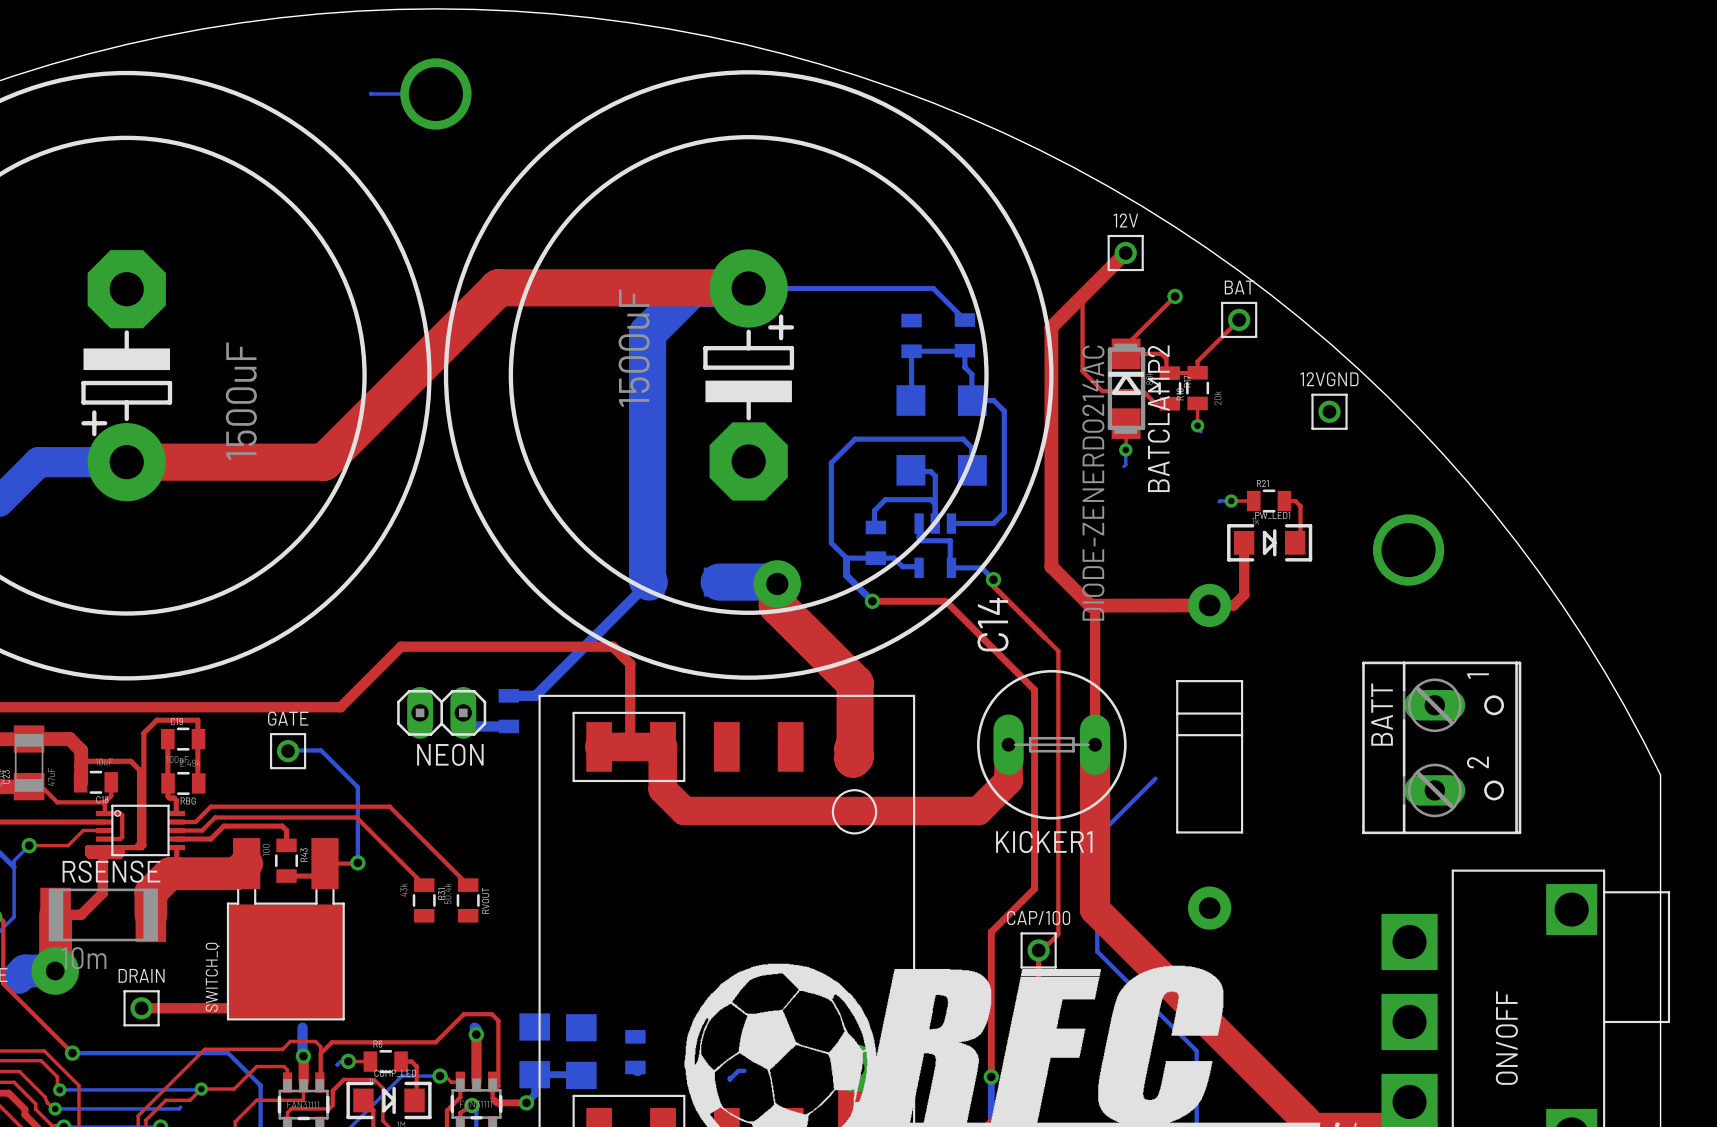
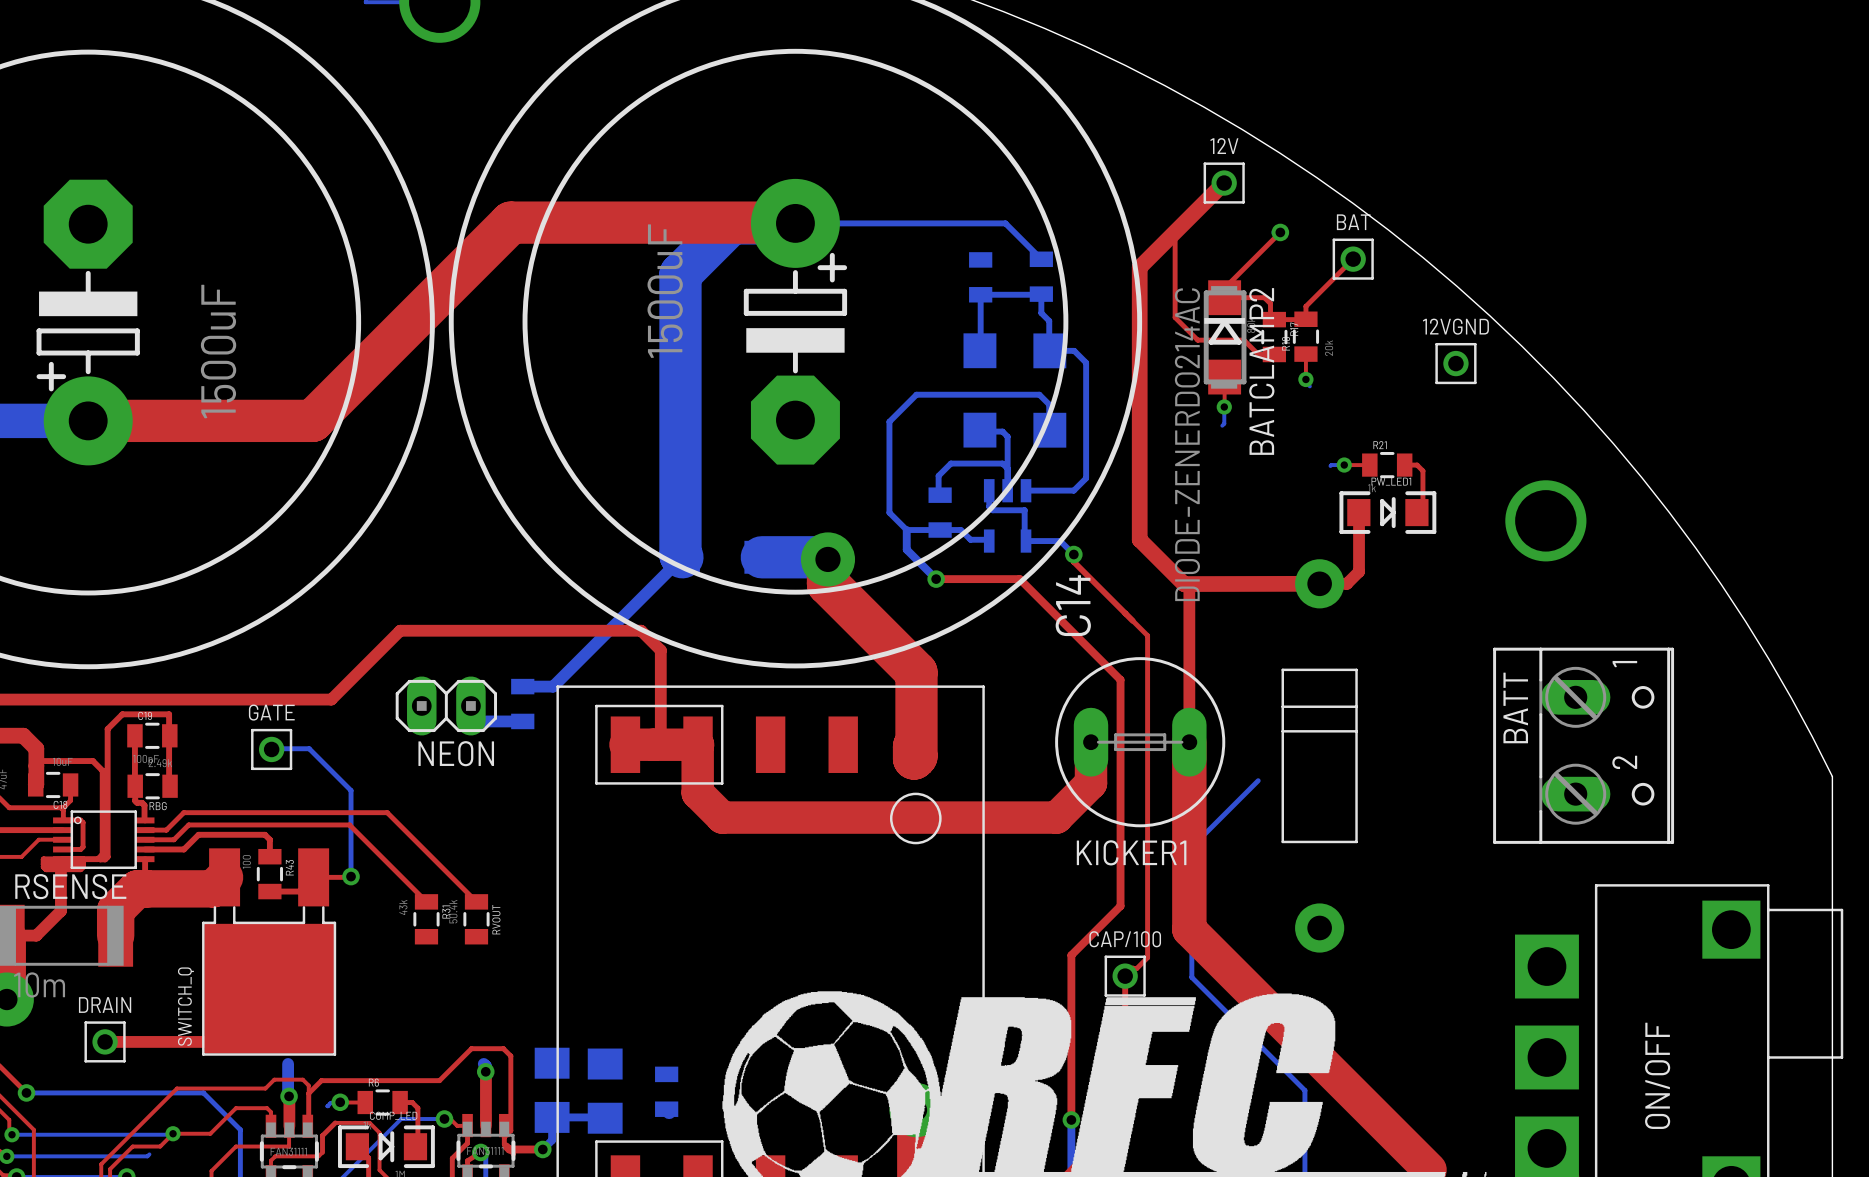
bottom track: (744, 1070) (738, 1070) (729, 1079) (729, 1077) -> none

